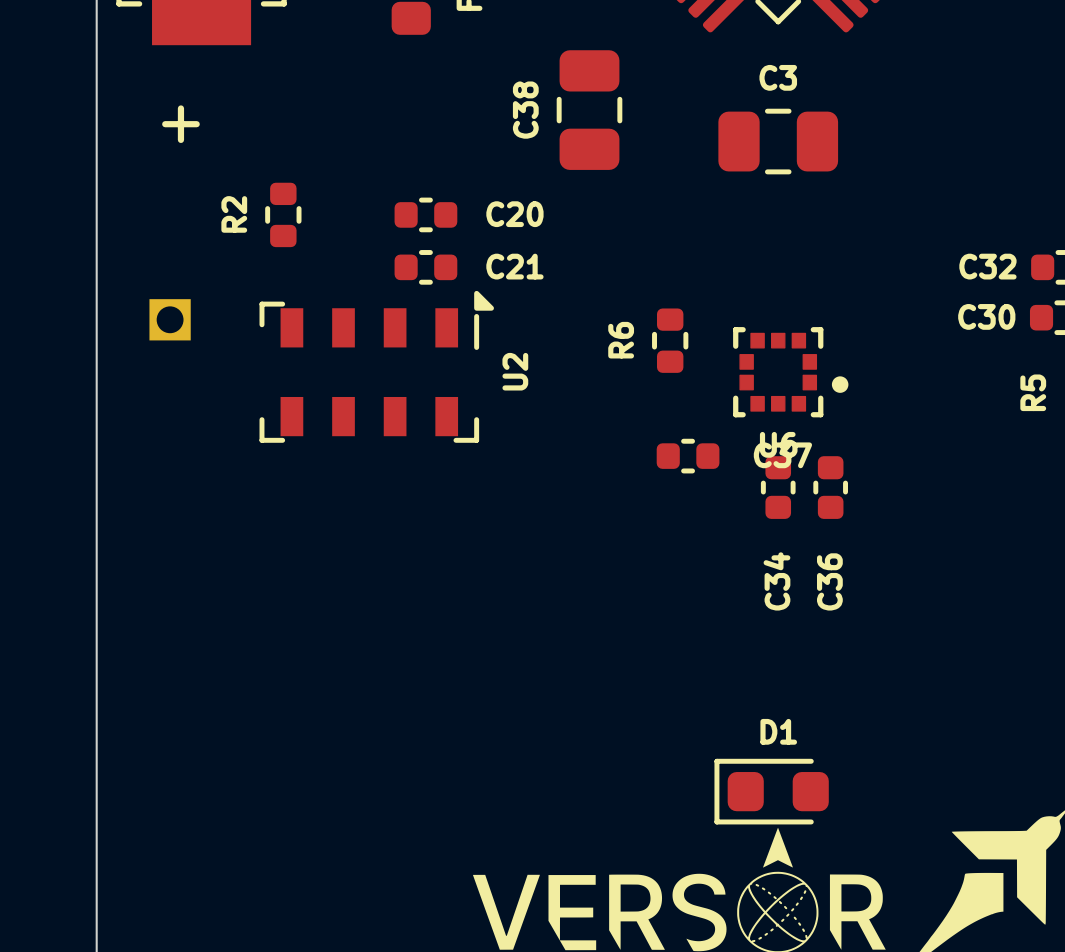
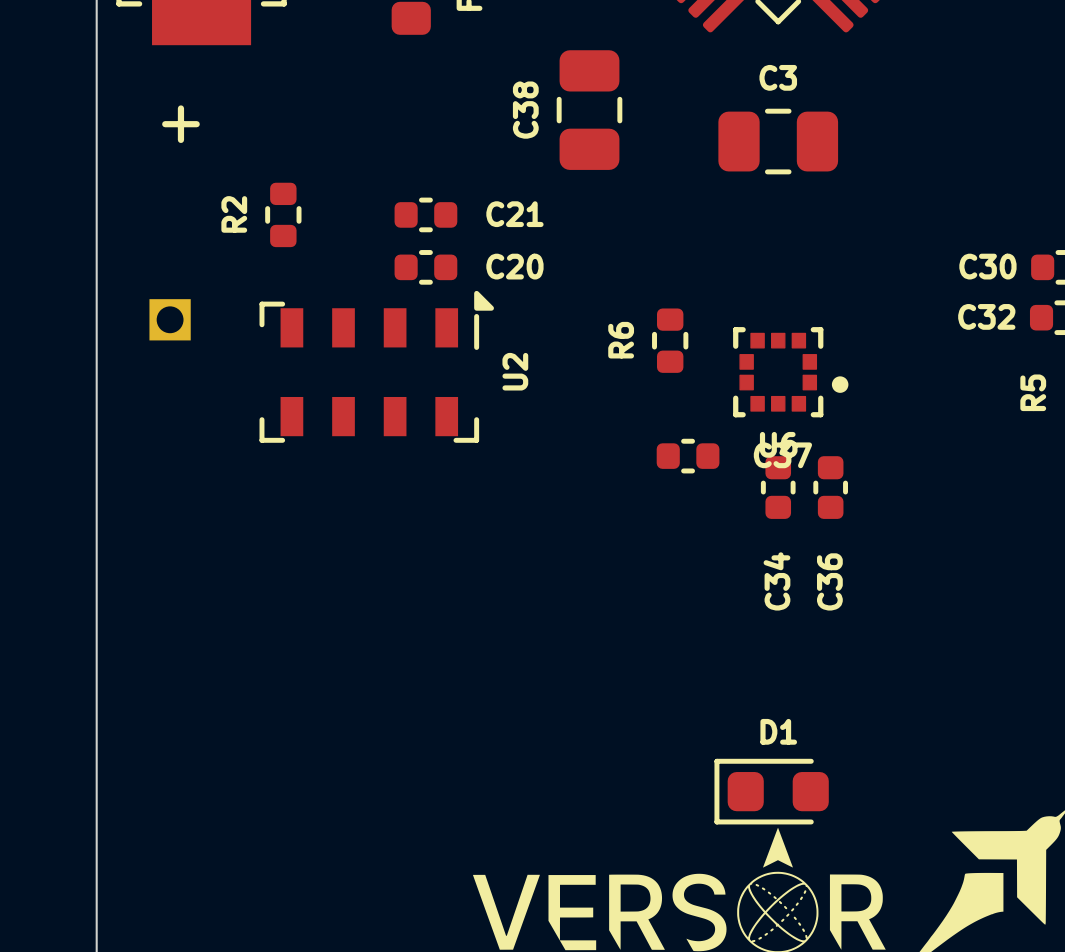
C20 name: C20 (514, 214) -> C21 (514, 214)
C21 name: C21 (514, 266) -> C20 (514, 266)
C32 name: C32 (987, 266) -> C30 (987, 266)
C30 name: C30 (986, 316) -> C32 (986, 316)

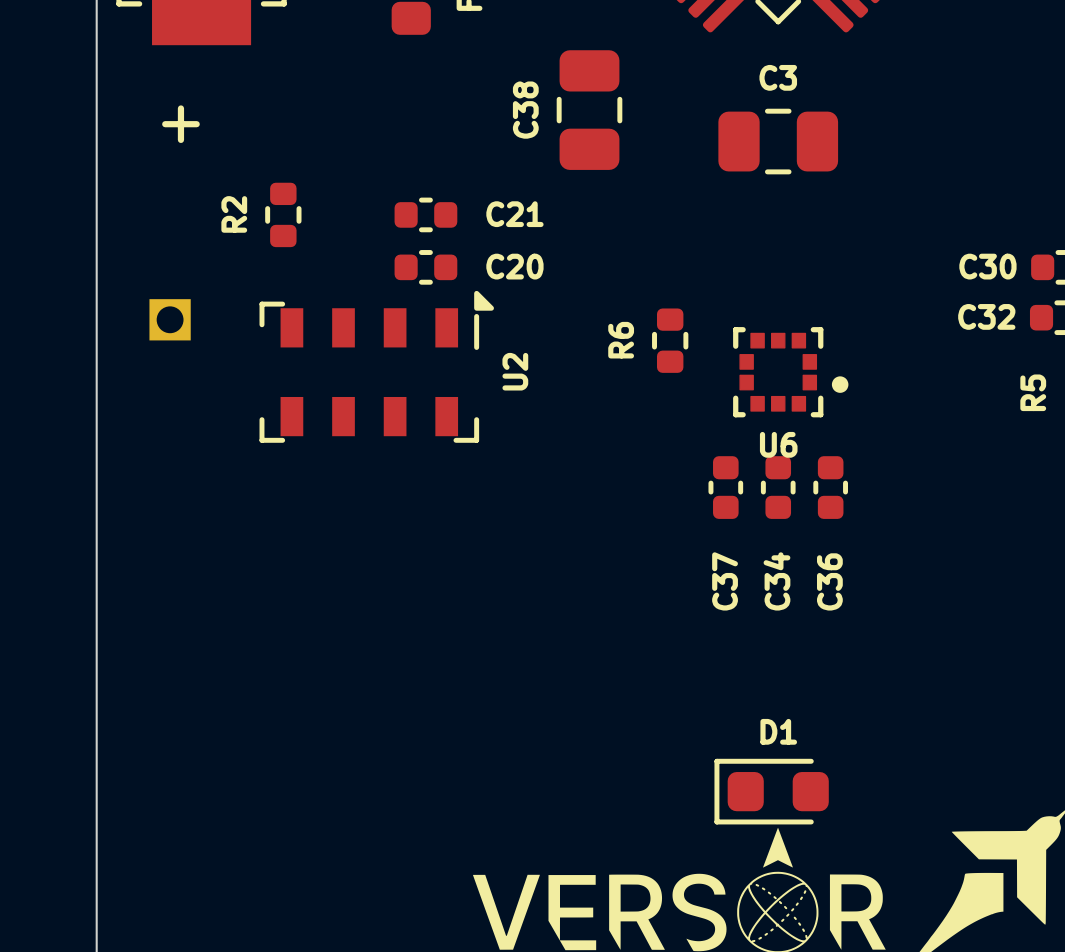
C37 rotation: 0° (688, 456) -> 90° clockwise (725, 487)
C37 position: (688, 456) -> (725, 487)

